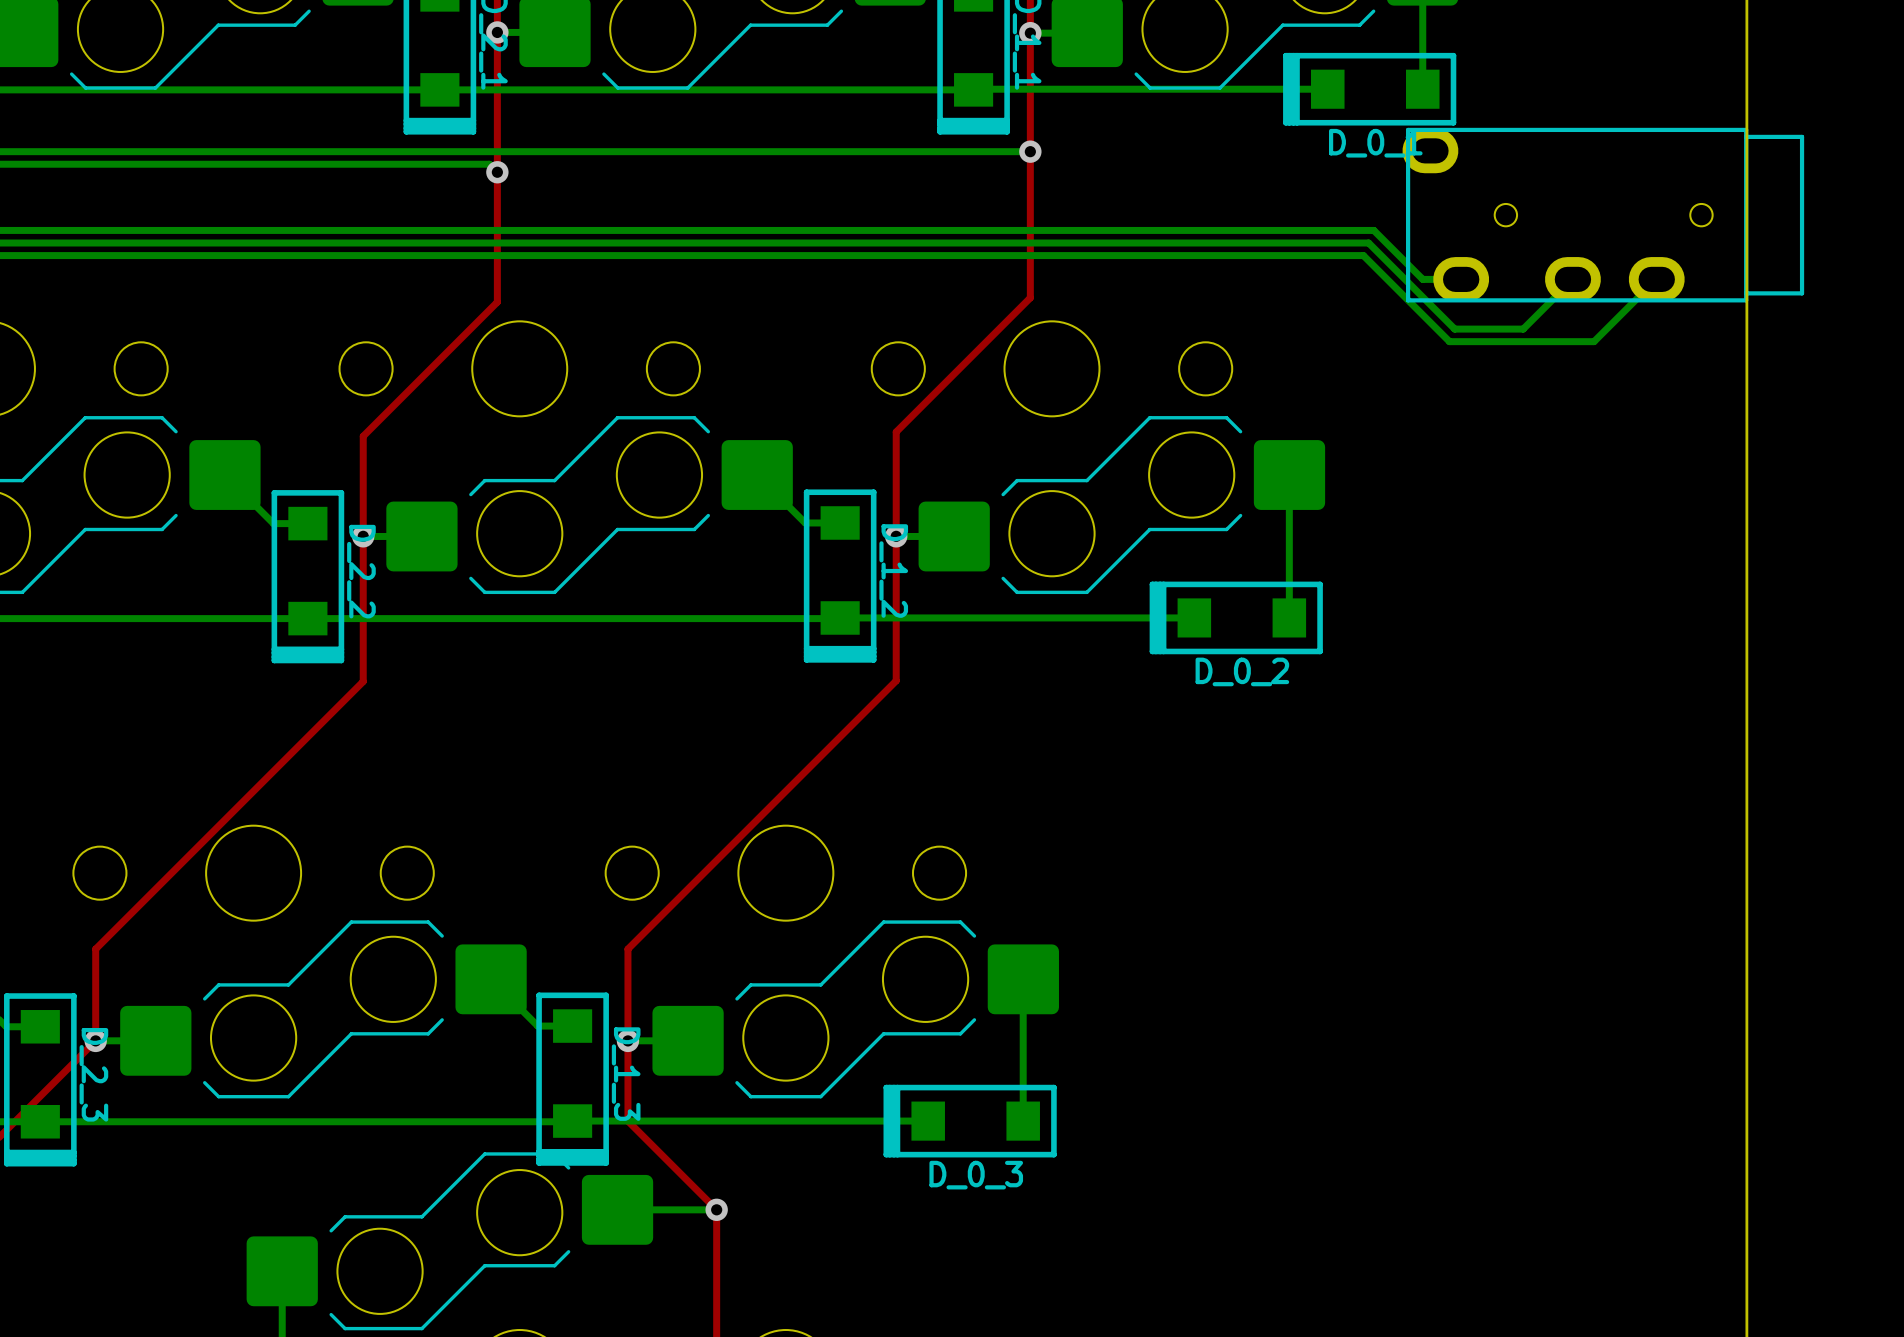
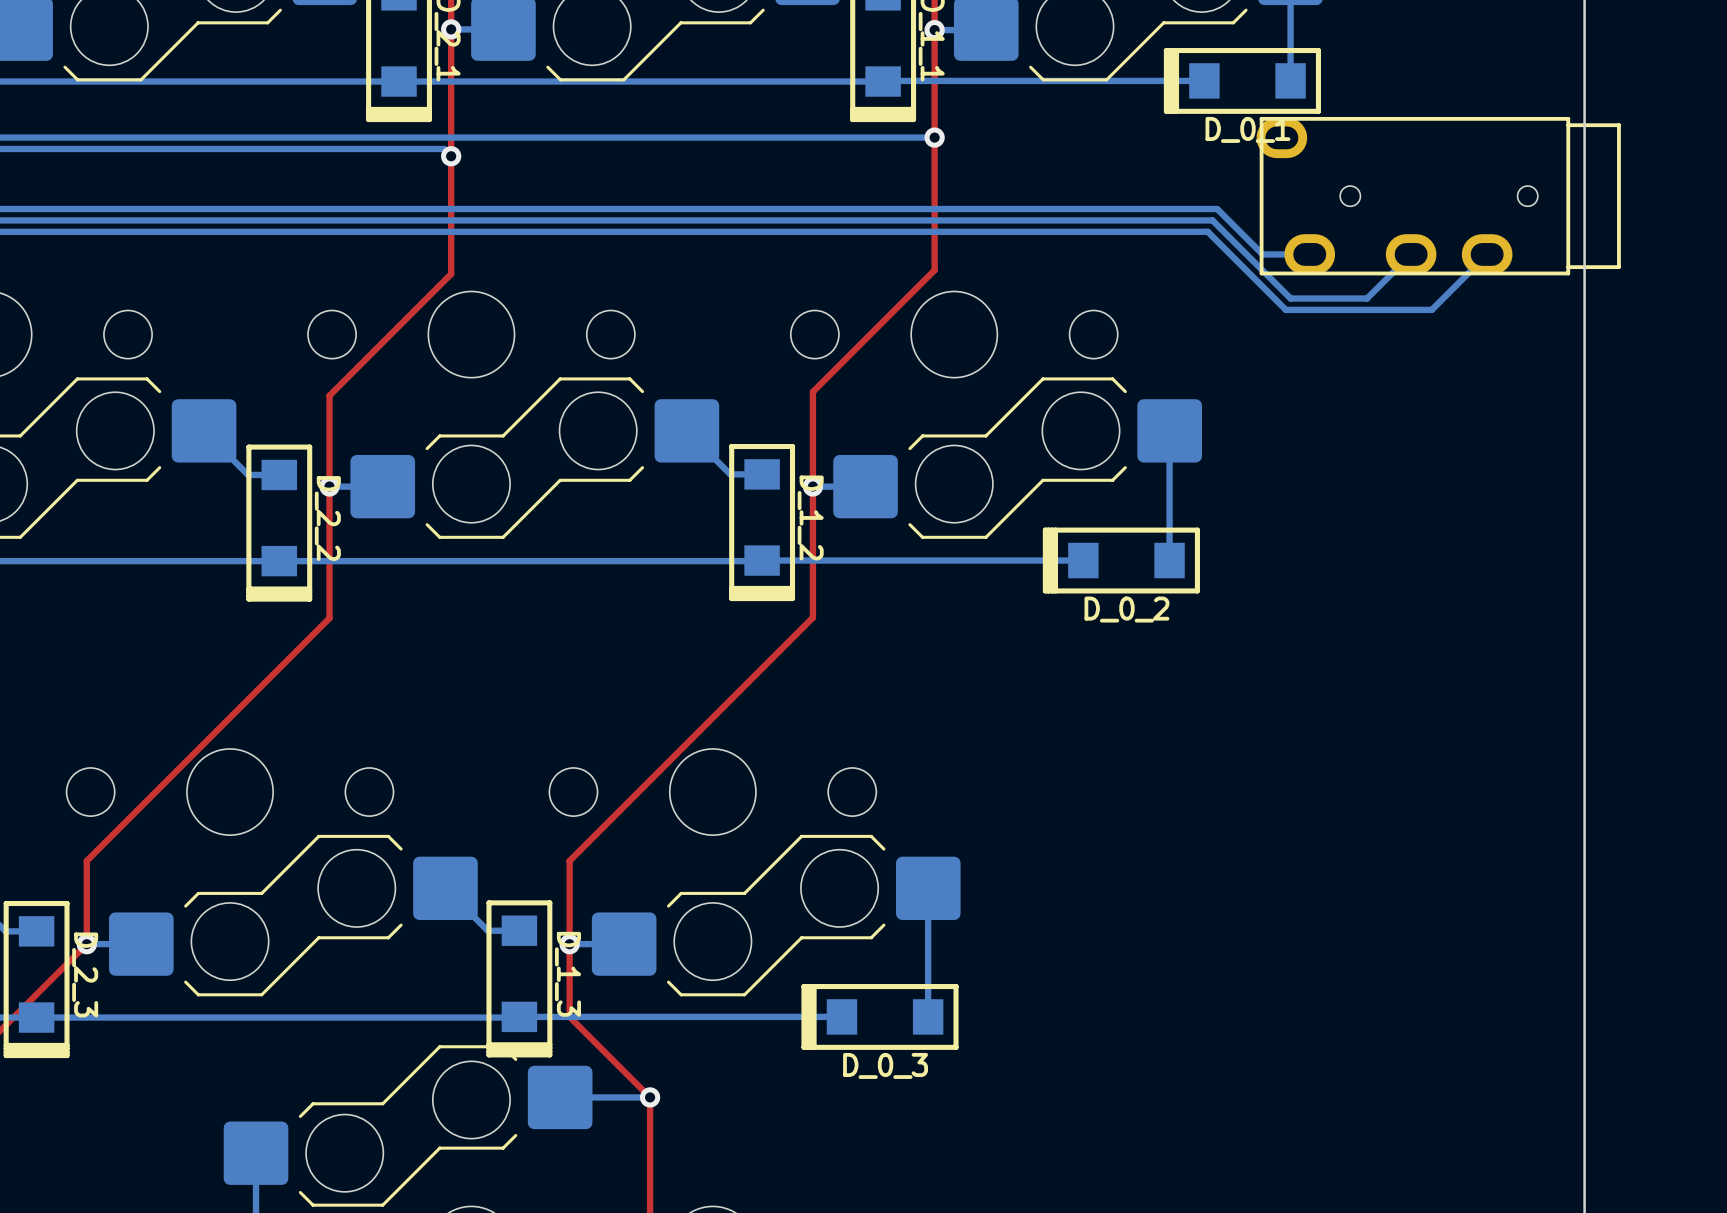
part position: (1603, 215) -> (1438, 196)
bottom track: (1341, 230) (1373, 230) (1422, 279) (1461, 279) -> (1217, 209) (1262, 254) (1309, 254)
bottom track: (1336, 243) (1368, 243) (1454, 329) -> (1212, 220) (1290, 298) (1319, 298)
bottom track: (1331, 255) (1363, 255) (1449, 341) -> (1207, 231) (1285, 309) (1314, 309)
bottom track: (1572, 279) (1523, 329) (1507, 329) -> (1411, 254) (1367, 298)
bottom track: (1656, 279) (1594, 341) (1578, 341) -> (1487, 254) (1431, 309)

